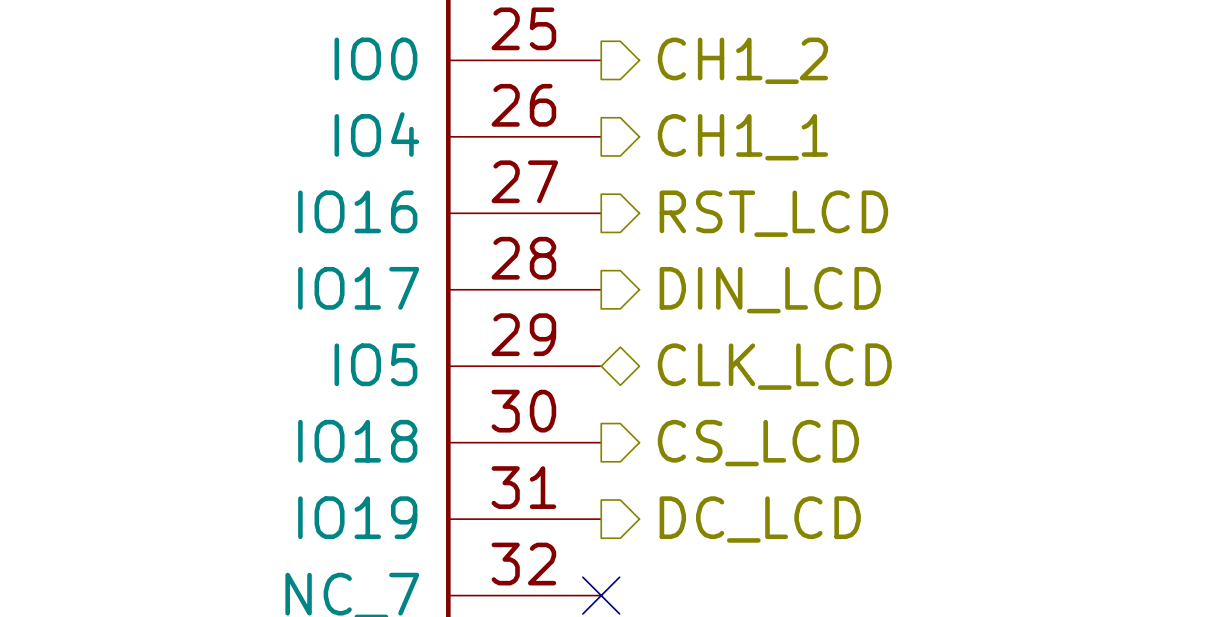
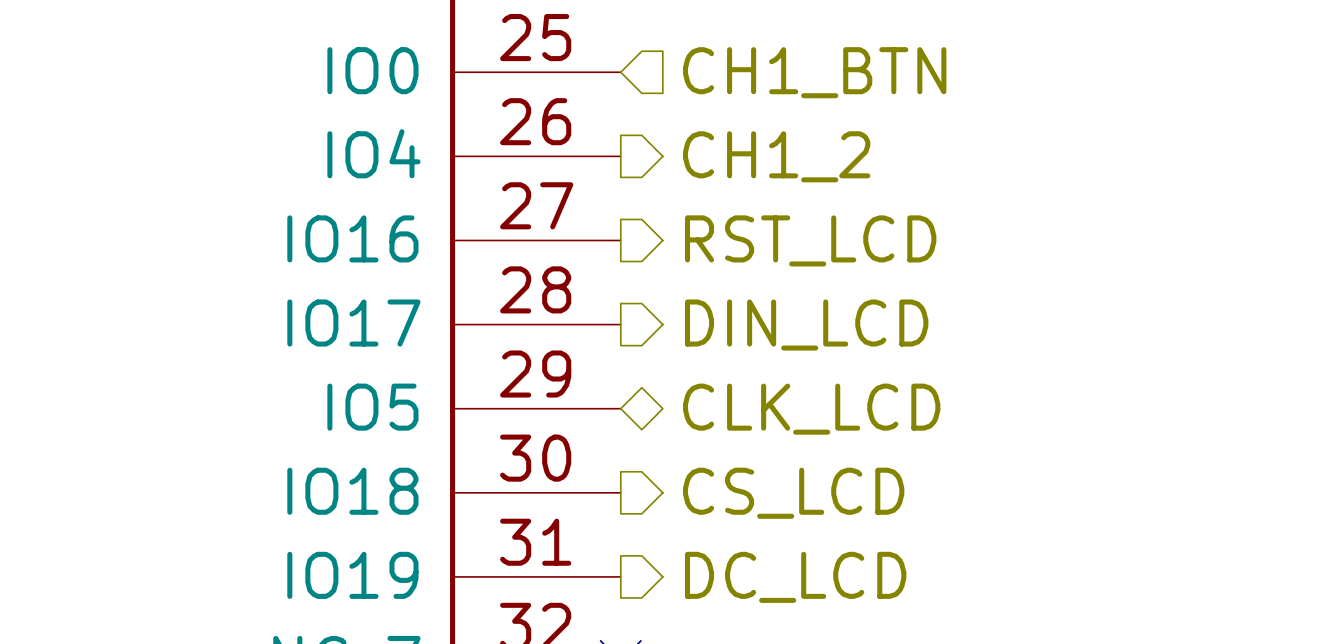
hierarchical label shape: output (742, 60) -> input (814, 72)
hierarchical label: CH1_2 (742, 60) -> CH1_BTN (814, 72)
hierarchical label: CH1_1 (742, 137) -> CH1_2 (776, 156)

